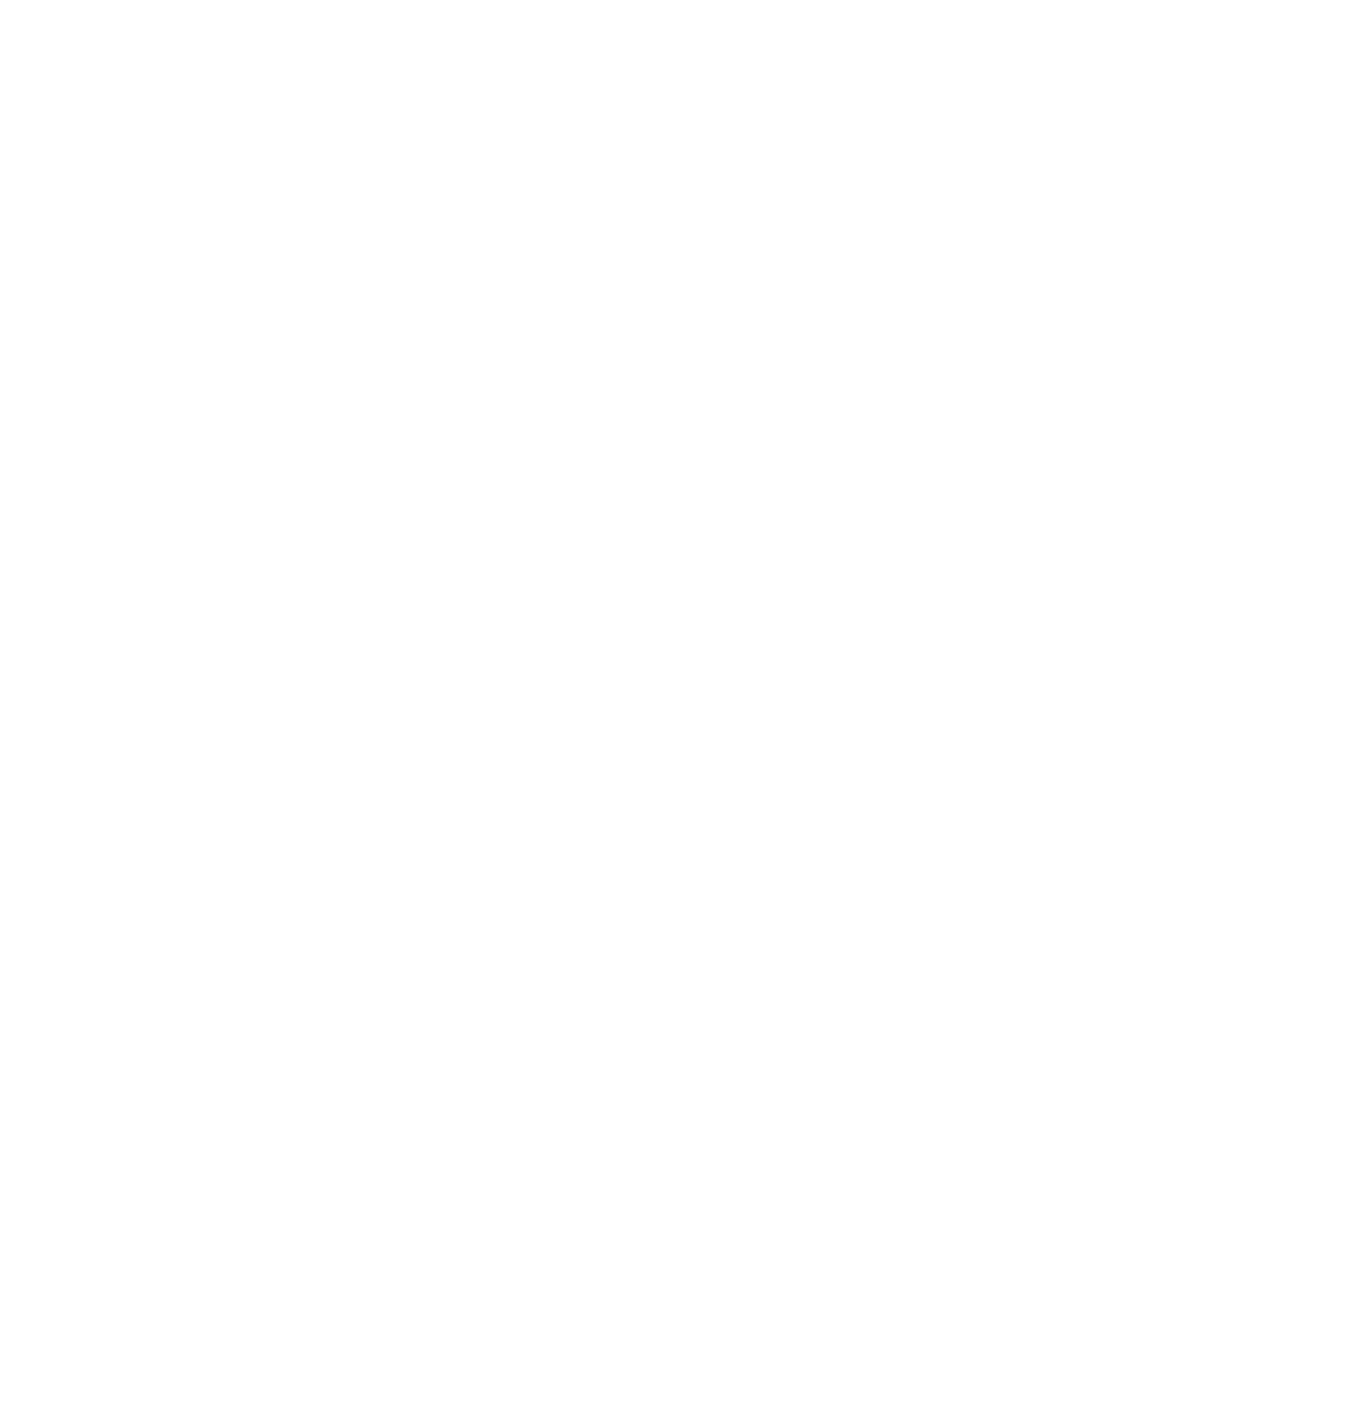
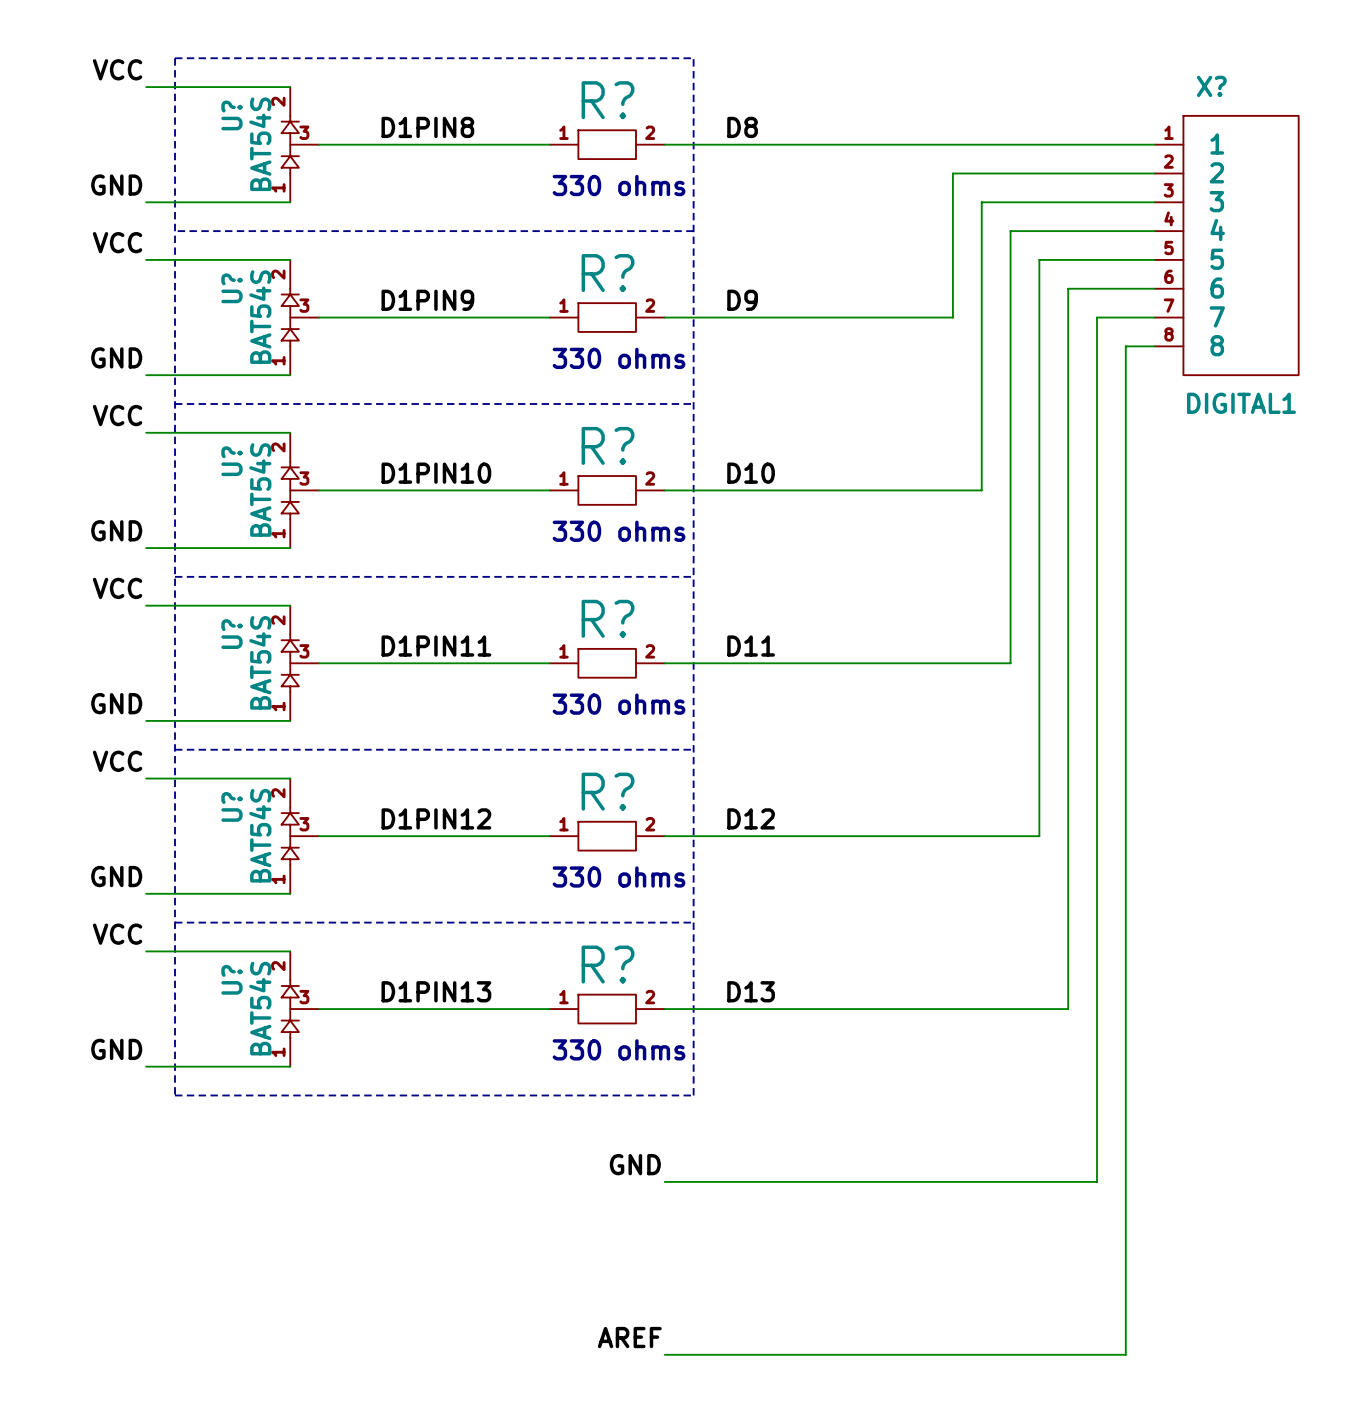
line: none -> (175, 58) (175, 1095) (693, 1095) (693, 58) (175, 58)
label: none -> VCC (117, 69)
wire: none -> (146, 87) (290, 87)
label: none -> D1PIN8 (427, 127)
label: none -> D8 (742, 127)
U?: none -> BAT54S (300, 144)
wire: none -> (319, 144) (549, 144)
R?: none -> (607, 144)
wire: none -> (664, 144) (1154, 144)
wire: none -> (1154, 173) (952, 173) (952, 317) (664, 317)
label: none -> GND (116, 185)
text: none -> 330 ohms (619, 185)
wire: none -> (146, 202) (290, 202)
wire: none -> (1154, 202) (981, 202) (981, 490) (664, 490)
line: none -> (175, 231) (693, 231)
wire: none -> (1154, 231) (1010, 231) (1010, 663) (664, 663)
label: none -> VCC (117, 242)
X?: none -> DIGITAL1 (1226, 245)
wire: none -> (146, 259) (290, 259)
wire: none -> (1154, 259) (1039, 259) (1039, 836) (664, 836)
wire: none -> (1154, 288) (1068, 288) (1068, 1009) (664, 1009)
label: none -> D1PIN9 (427, 300)
label: none -> D9 (742, 300)
U?: none -> BAT54S (300, 317)
wire: none -> (319, 317) (549, 317)
R?: none -> (607, 317)
wire: none -> (1154, 317) (1096, 317) (1096, 1181) (664, 1181)
wire: none -> (1154, 346) (1125, 346) (1125, 1354) (664, 1354)
label: none -> GND (116, 357)
text: none -> 330 ohms (619, 358)
wire: none -> (146, 375) (290, 375)
line: none -> (175, 403) (693, 403)
label: none -> VCC (117, 415)
wire: none -> (146, 432) (290, 432)
label: none -> D1PIN10 (436, 473)
label: none -> D10 (751, 473)
U?: none -> BAT54S (300, 490)
wire: none -> (319, 490) (549, 490)
R?: none -> (607, 490)
label: none -> GND (116, 530)
text: none -> 330 ohms (619, 531)
wire: none -> (146, 548) (290, 548)
line: none -> (175, 576) (693, 576)
label: none -> VCC (117, 588)
wire: none -> (146, 605) (290, 605)
label: none -> D1PIN11 (436, 646)
label: none -> D11 (751, 646)
U?: none -> BAT54S (300, 663)
wire: none -> (319, 663) (549, 663)
R?: none -> (607, 663)
label: none -> GND (116, 703)
text: none -> 330 ohms (619, 704)
wire: none -> (146, 720) (290, 720)
line: none -> (175, 749) (693, 749)
label: none -> VCC (117, 761)
wire: none -> (146, 778) (290, 778)
label: none -> D1PIN12 (436, 818)
label: none -> D12 (751, 818)
U?: none -> BAT54S (300, 836)
wire: none -> (319, 836) (549, 836)
R?: none -> (607, 836)
label: none -> GND (116, 876)
text: none -> 330 ohms (619, 877)
wire: none -> (146, 893) (290, 893)
line: none -> (175, 922) (693, 922)
label: none -> VCC (117, 934)
wire: none -> (146, 951) (290, 951)
label: none -> D1PIN13 (436, 991)
label: none -> D13 (751, 991)
U?: none -> BAT54S (300, 1009)
wire: none -> (319, 1009) (549, 1009)
R?: none -> (607, 1009)
label: none -> GND (116, 1049)
text: none -> 330 ohms (619, 1049)
wire: none -> (146, 1066) (290, 1066)
label: none -> GND (635, 1164)
label: none -> AREF (629, 1337)

